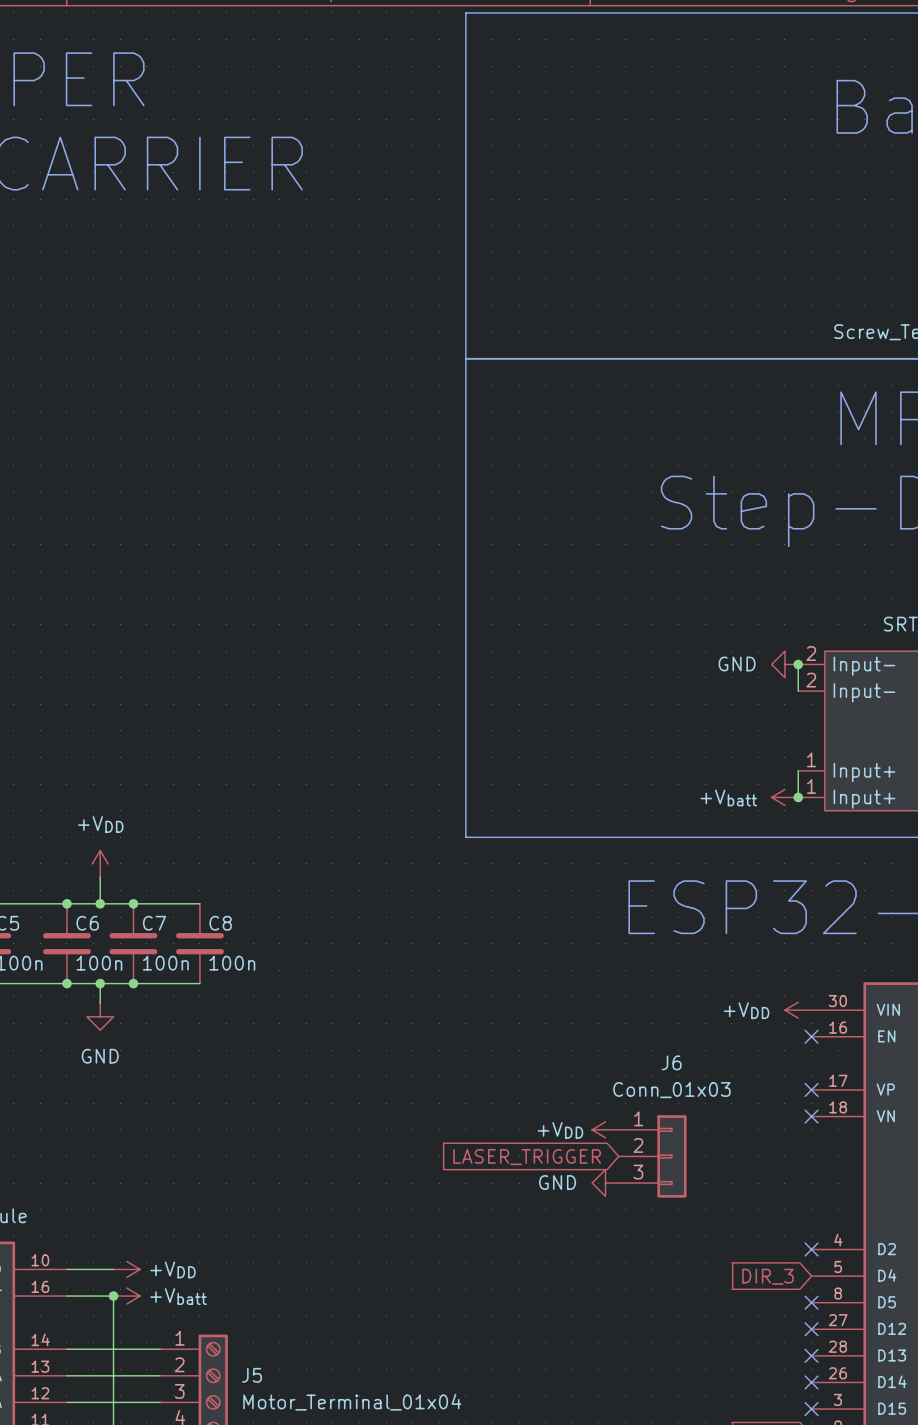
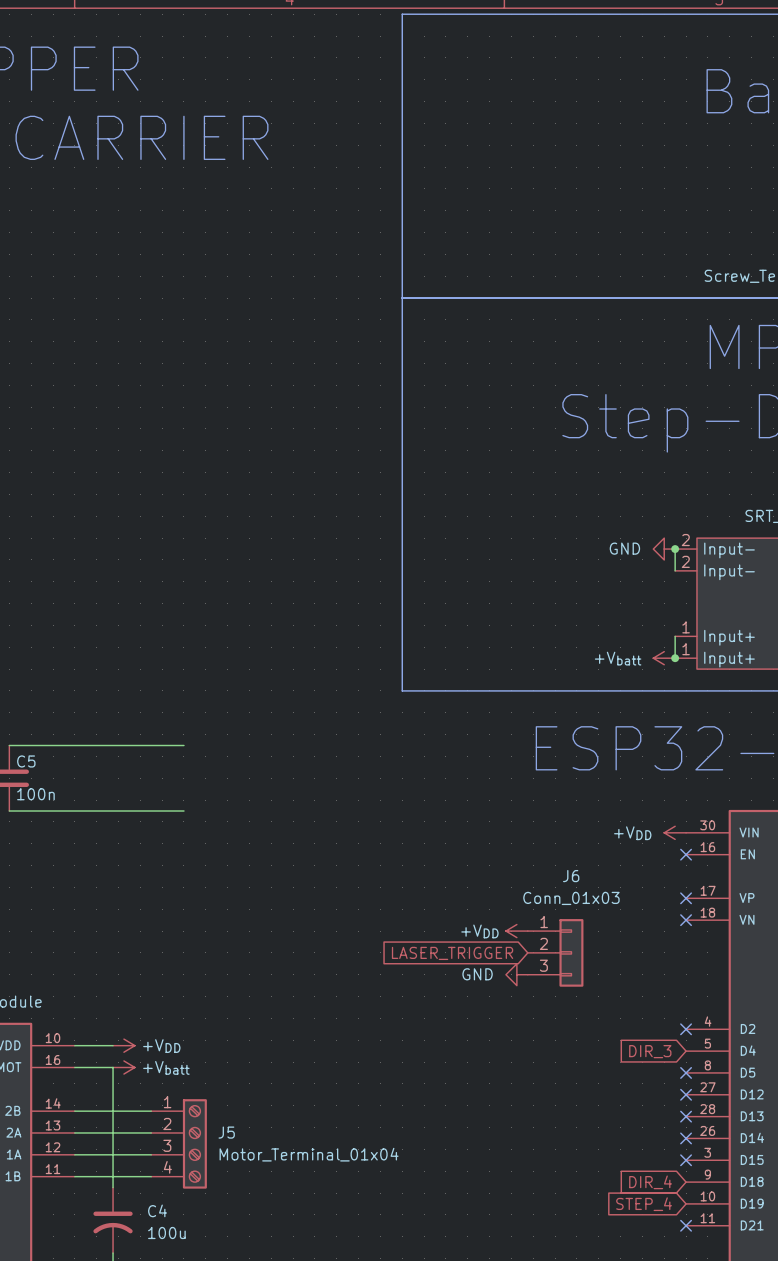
power symbol: +VDD (100, 863) -> none
wire: (100, 877) (100, 903) -> none
junction: (66, 903) -> none
junction: (100, 903) -> none
junction: (133, 903) -> none
C6: 100n (66, 943) -> none
C7: 100n (133, 943) -> none
C8: 100n (199, 943) -> none
junction: (66, 983) -> none
wire: (100, 983) (100, 1003) -> none
junction: (100, 983) -> none
junction: (133, 983) -> none
power symbol: GND (100, 1016) -> none
junction: (113, 1296) -> none

